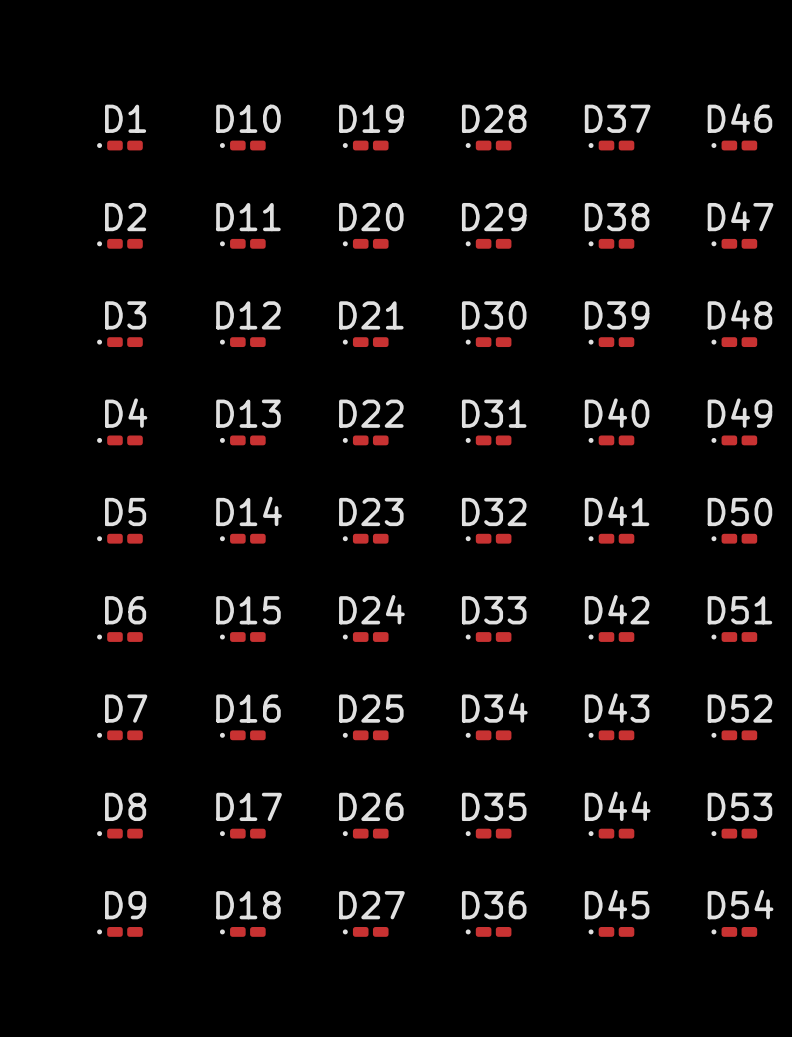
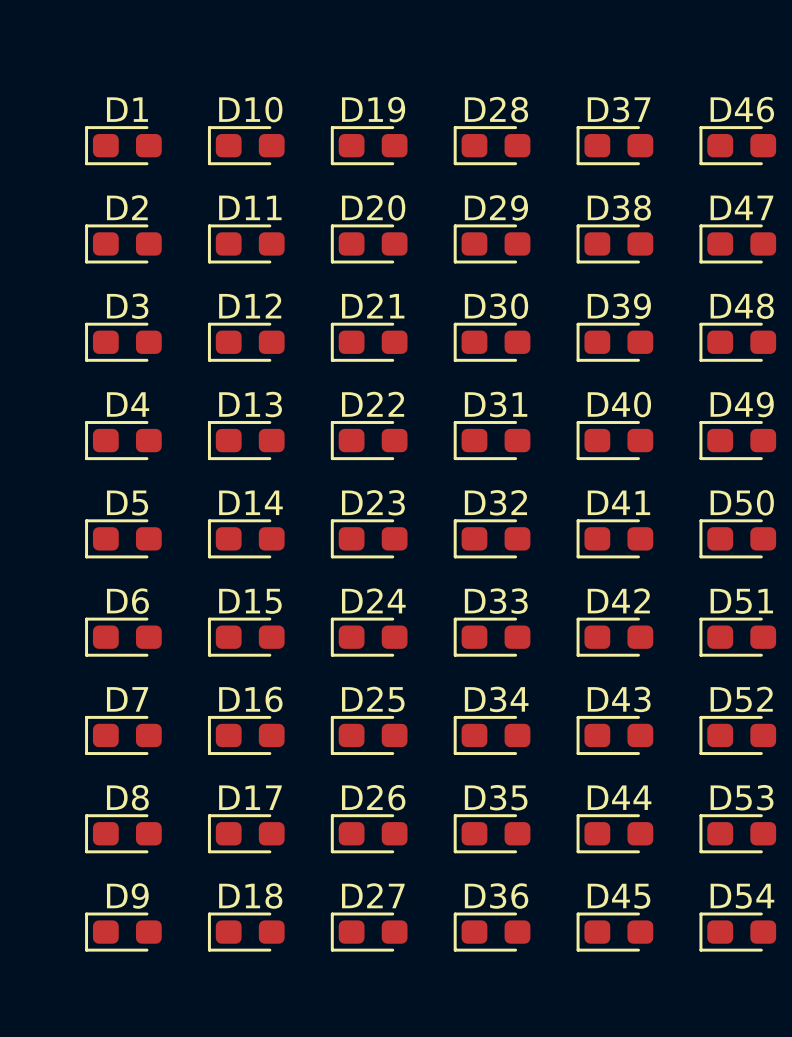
D1 footprint: [97, 140, 143, 151] -> [85, 126, 162, 166]
D10 footprint: [219, 140, 266, 151] -> [207, 126, 285, 166]
D19 footprint: [342, 140, 389, 151] -> [330, 126, 408, 166]
D28 footprint: [465, 140, 512, 151] -> [453, 126, 531, 166]
D37 footprint: [588, 140, 635, 151] -> [576, 126, 654, 166]
D46 footprint: [711, 140, 758, 151] -> [699, 126, 777, 166]
D2 footprint: [97, 238, 143, 249] -> [85, 224, 162, 264]
D11 footprint: [219, 238, 266, 249] -> [207, 224, 285, 264]
D20 footprint: [342, 238, 389, 249] -> [330, 224, 408, 264]
D29 footprint: [465, 238, 512, 249] -> [453, 224, 531, 264]
D38 footprint: [588, 238, 635, 249] -> [576, 224, 654, 264]
D47 footprint: [711, 238, 758, 249] -> [699, 224, 777, 264]
D3 footprint: [97, 337, 143, 348] -> [85, 322, 162, 362]
D12 footprint: [219, 337, 266, 348] -> [207, 322, 285, 362]
D21 footprint: [342, 337, 389, 348] -> [330, 322, 408, 362]
D30 footprint: [465, 337, 512, 348] -> [453, 322, 531, 362]
D39 footprint: [588, 337, 635, 348] -> [576, 322, 654, 362]
D48 footprint: [711, 337, 758, 348] -> [699, 322, 777, 362]
D4 footprint: [97, 435, 143, 446] -> [85, 421, 162, 461]
D13 footprint: [219, 435, 266, 446] -> [207, 421, 285, 461]
D22 footprint: [342, 435, 389, 446] -> [330, 421, 408, 461]
D31 footprint: [465, 435, 512, 446] -> [453, 421, 531, 461]
D40 footprint: [588, 435, 635, 446] -> [576, 421, 654, 461]
D49 footprint: [711, 435, 758, 446] -> [699, 421, 777, 461]
D5 footprint: [97, 533, 143, 544] -> [85, 519, 162, 559]
D14 footprint: [219, 533, 266, 544] -> [207, 519, 285, 559]
D23 footprint: [342, 533, 389, 544] -> [330, 519, 408, 559]
D32 footprint: [465, 533, 512, 544] -> [453, 519, 531, 559]
D41 footprint: [588, 533, 635, 544] -> [576, 519, 654, 559]
D50 footprint: [711, 533, 758, 544] -> [699, 519, 777, 559]
D6 footprint: [97, 632, 143, 642] -> [85, 617, 162, 657]
D15 footprint: [219, 632, 266, 642] -> [207, 617, 285, 657]
D24 footprint: [342, 632, 389, 642] -> [330, 617, 408, 657]
D33 footprint: [465, 632, 512, 642] -> [453, 617, 531, 657]
D42 footprint: [588, 632, 635, 642] -> [576, 617, 654, 657]
D51 footprint: [711, 632, 758, 642] -> [699, 617, 777, 657]
D7 footprint: [97, 730, 143, 741] -> [85, 715, 162, 756]
D16 footprint: [219, 730, 266, 741] -> [207, 715, 285, 756]
D25 footprint: [342, 730, 389, 741] -> [330, 715, 408, 756]
D34 footprint: [465, 730, 512, 741] -> [453, 715, 531, 756]
D43 footprint: [588, 730, 635, 741] -> [576, 715, 654, 756]
D52 footprint: [711, 730, 758, 741] -> [699, 715, 777, 756]
D8 footprint: [97, 828, 143, 839] -> [85, 814, 162, 854]
D17 footprint: [219, 828, 266, 839] -> [207, 814, 285, 854]
D26 footprint: [342, 828, 389, 839] -> [330, 814, 408, 854]
D35 footprint: [465, 828, 512, 839] -> [453, 814, 531, 854]
D44 footprint: [588, 828, 635, 839] -> [576, 814, 654, 854]
D53 footprint: [711, 828, 758, 839] -> [699, 814, 777, 854]
D9 footprint: [97, 927, 143, 937] -> [85, 912, 162, 952]
D18 footprint: [219, 927, 266, 937] -> [207, 912, 285, 952]
D27 footprint: [342, 927, 389, 937] -> [330, 912, 408, 952]
D36 footprint: [465, 927, 512, 937] -> [453, 912, 531, 952]
D45 footprint: [588, 927, 635, 937] -> [576, 912, 654, 952]
D54 footprint: [711, 927, 758, 937] -> [699, 912, 777, 952]

